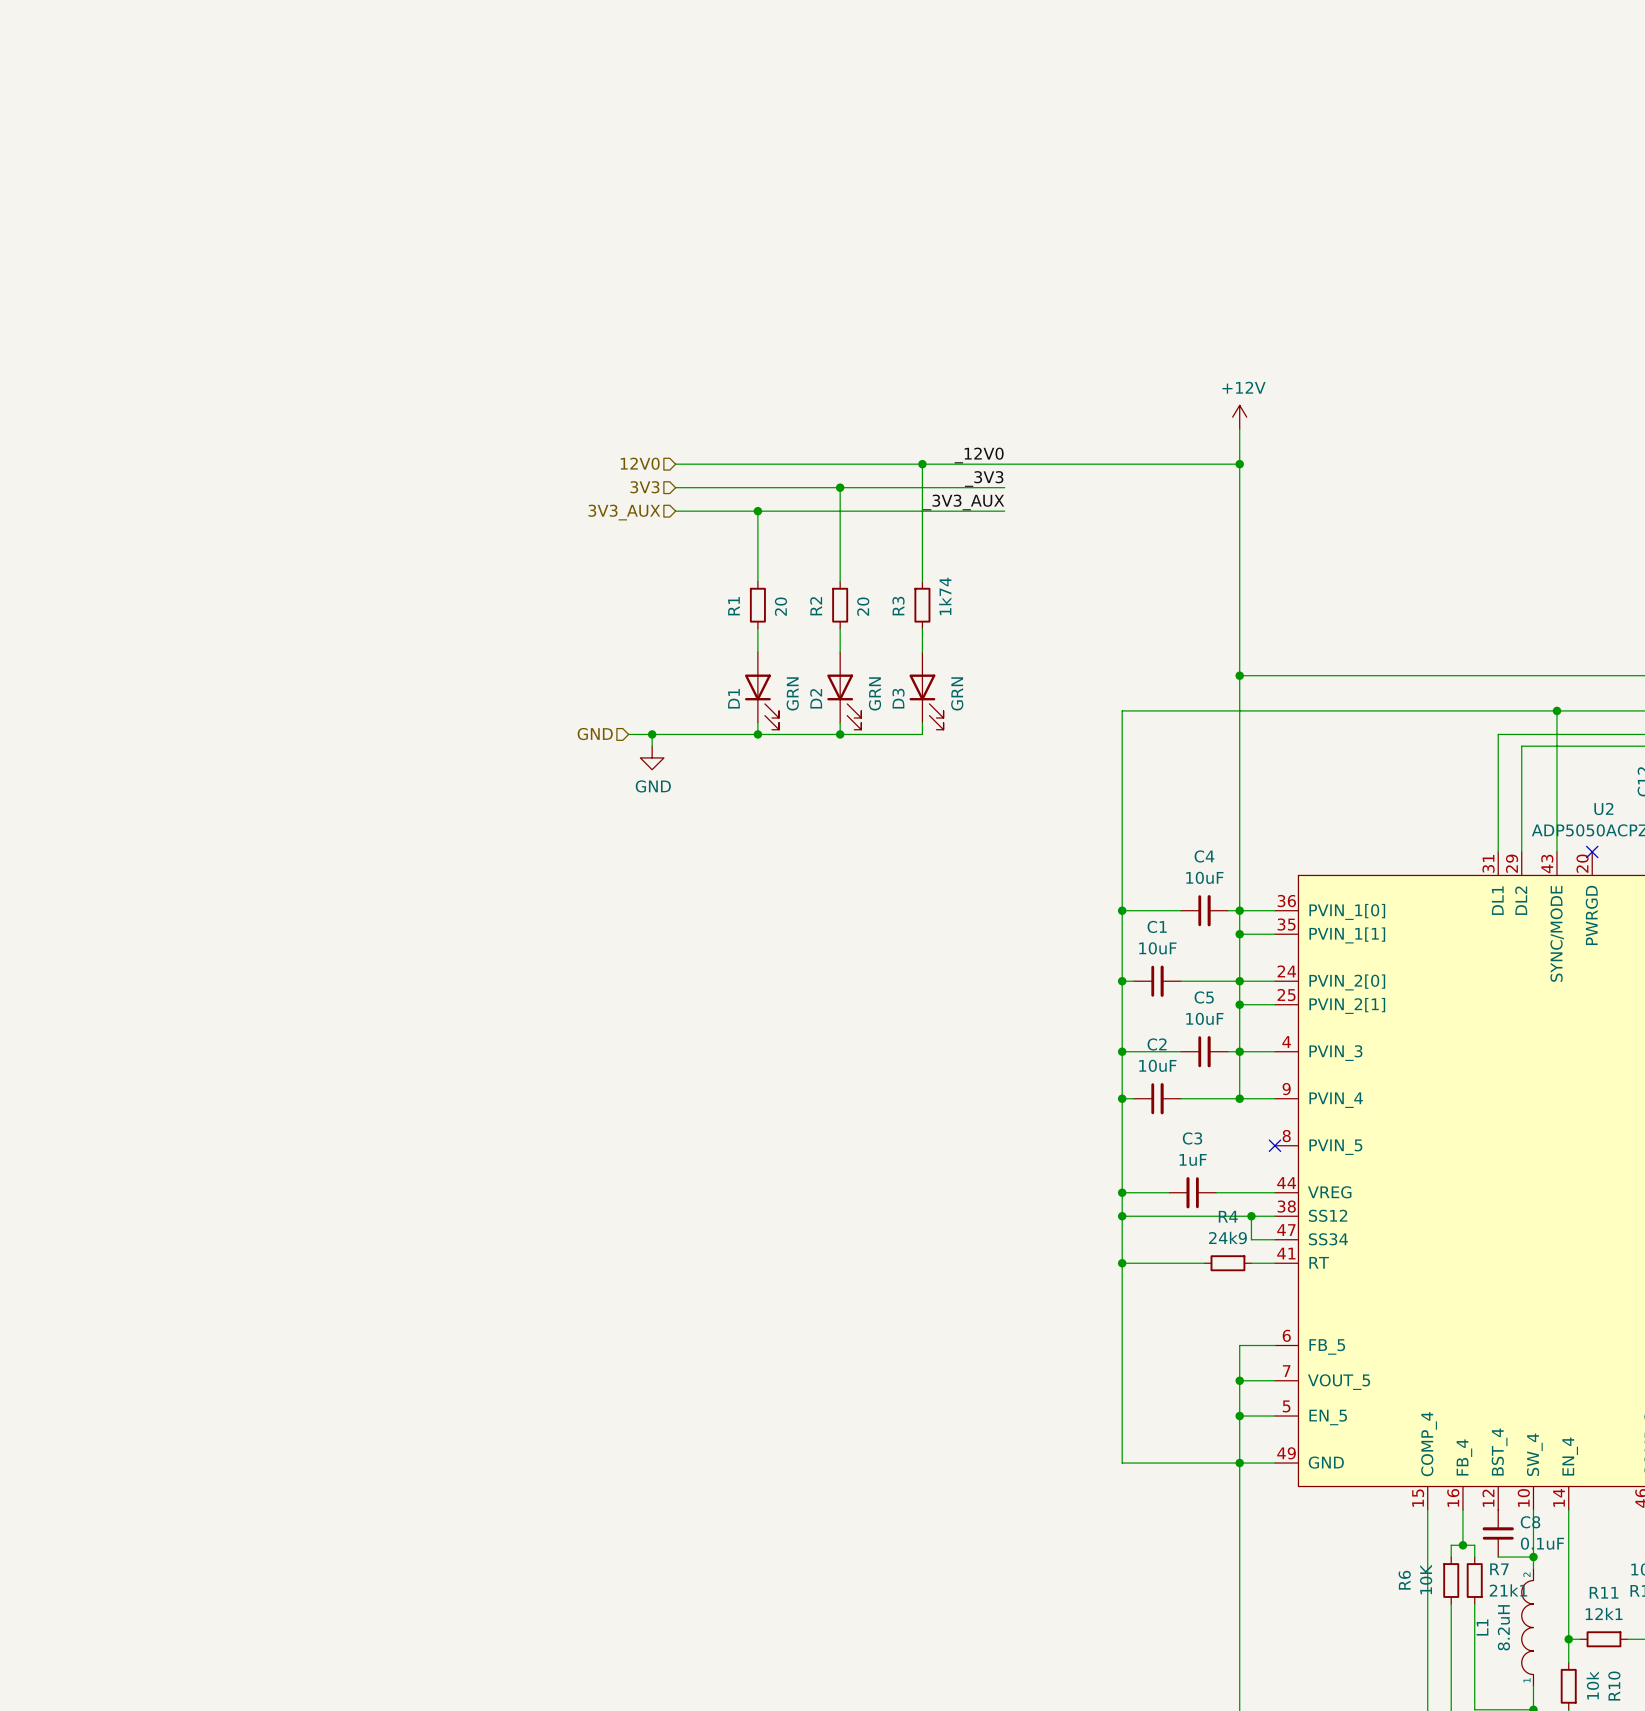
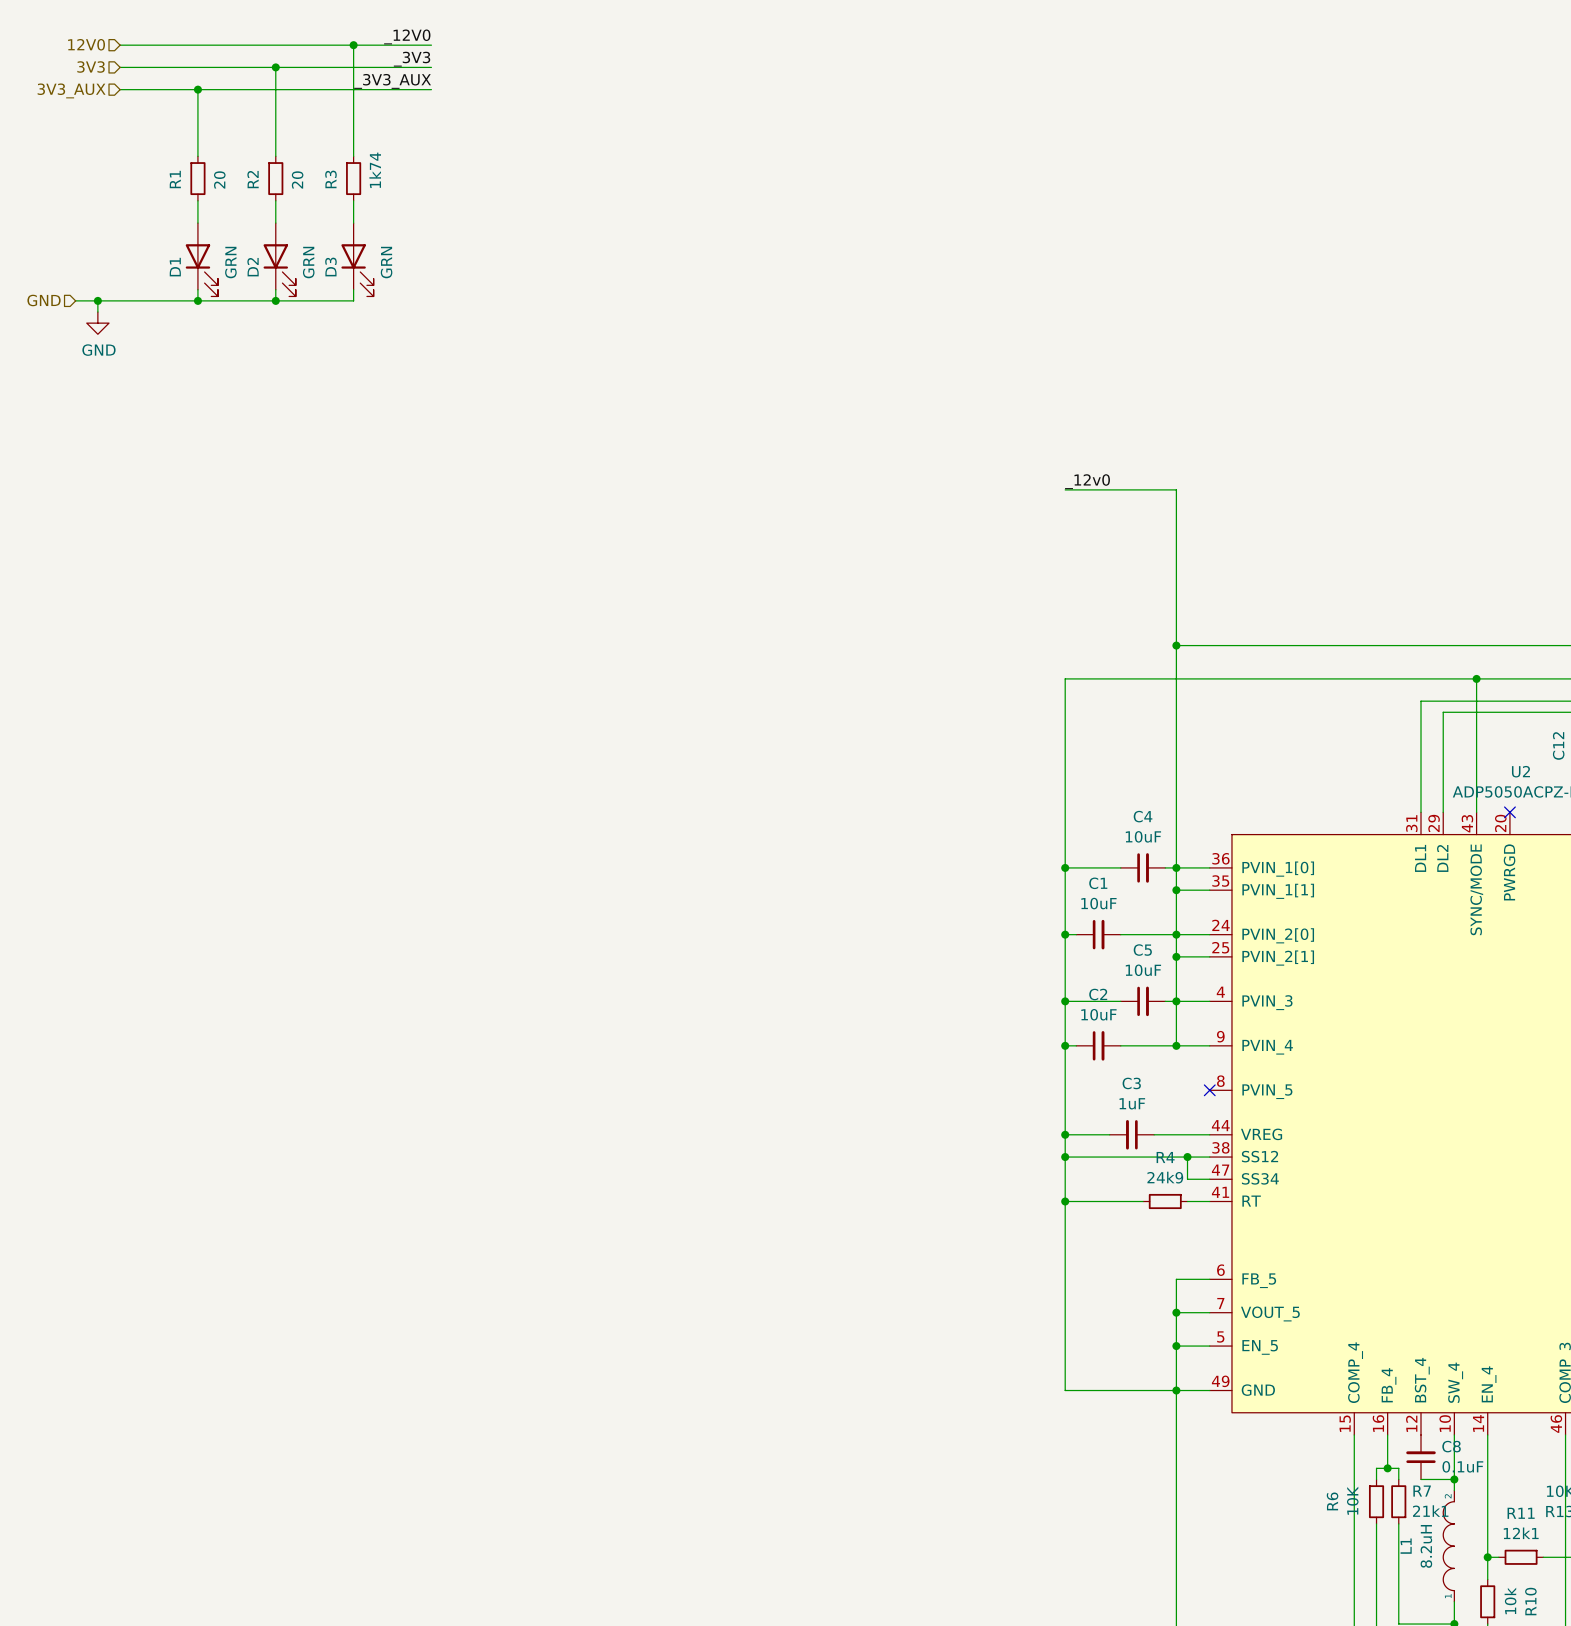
label: none -> _12V0 (407, 36)
hierarchical label: none -> 12V0 (86, 44)
wire: none -> (120, 45) (431, 45)
wire: none -> (353, 45) (353, 156)
junction: none -> (353, 45)
label: none -> _3V3 (412, 59)
hierarchical label: none -> 3V3 (91, 67)
wire: none -> (120, 67) (431, 67)
wire: none -> (275, 67) (275, 156)
junction: none -> (275, 67)
label: none -> _3V3_AUX (392, 81)
wire: none -> (120, 89) (431, 89)
wire: none -> (197, 89) (197, 156)
junction: none -> (197, 89)
hierarchical label: none -> 3V3_AUX (71, 90)
wire: none -> (197, 200) (197, 223)
wire: none -> (275, 200) (275, 223)
wire: none -> (353, 200) (353, 223)
wire: none -> (197, 289) (197, 300)
wire: none -> (275, 289) (275, 300)
wire: none -> (353, 289) (353, 300) (75, 300)
hierarchical label: none -> GND (44, 300)
wire: none -> (97, 300) (97, 312)
junction: none -> (97, 300)
junction: none -> (197, 300)
junction: none -> (275, 300)
power symbol: none -> GND (97, 323)
power symbol: +12V (1239, 417) -> none
wire: (1239, 428) (1239, 511) -> (1065, 489) (1176, 489)
label: _12V0 (979, 455) -> none
hierarchical label: 12V0 (640, 463) -> none
wire: (675, 464) (1239, 464) -> none
wire: (922, 464) (922, 581) -> none
junction: (922, 464) -> none
junction: (1239, 464) -> none
label: _3V3 (984, 478) -> none
hierarchical label: 3V3 (644, 487) -> none
wire: (675, 487) (1004, 487) -> none
wire: (840, 487) (840, 581) -> none
junction: (840, 487) -> none
label: _3V3_AUX (963, 502) -> none
label: none -> _12v0 (1087, 481)
wire: (675, 511) (1004, 511) -> none
wire: (757, 511) (757, 581) -> none
junction: (757, 511) -> none
hierarchical label: 3V3_AUX (624, 512) -> none
R1 position: (757, 605) -> (197, 178)
R2 position: (840, 605) -> (275, 178)
R3 position: (922, 605) -> (353, 178)
wire: (757, 628) (757, 652) -> none
wire: (840, 628) (840, 652) -> none
wire: (922, 628) (922, 652) -> none
D1 position: (762, 690) -> (201, 259)
D2 position: (844, 690) -> (279, 259)
D3 position: (926, 690) -> (357, 259)
wire: (757, 722) (757, 734) -> none
wire: (840, 722) (840, 734) -> none
wire: (922, 722) (922, 734) (628, 734) -> none
hierarchical label: GND (595, 734) -> none
wire: (652, 734) (652, 746) -> none
junction: (652, 734) -> none
junction: (757, 734) -> none
junction: (840, 734) -> none
power symbol: GND (652, 757) -> none

